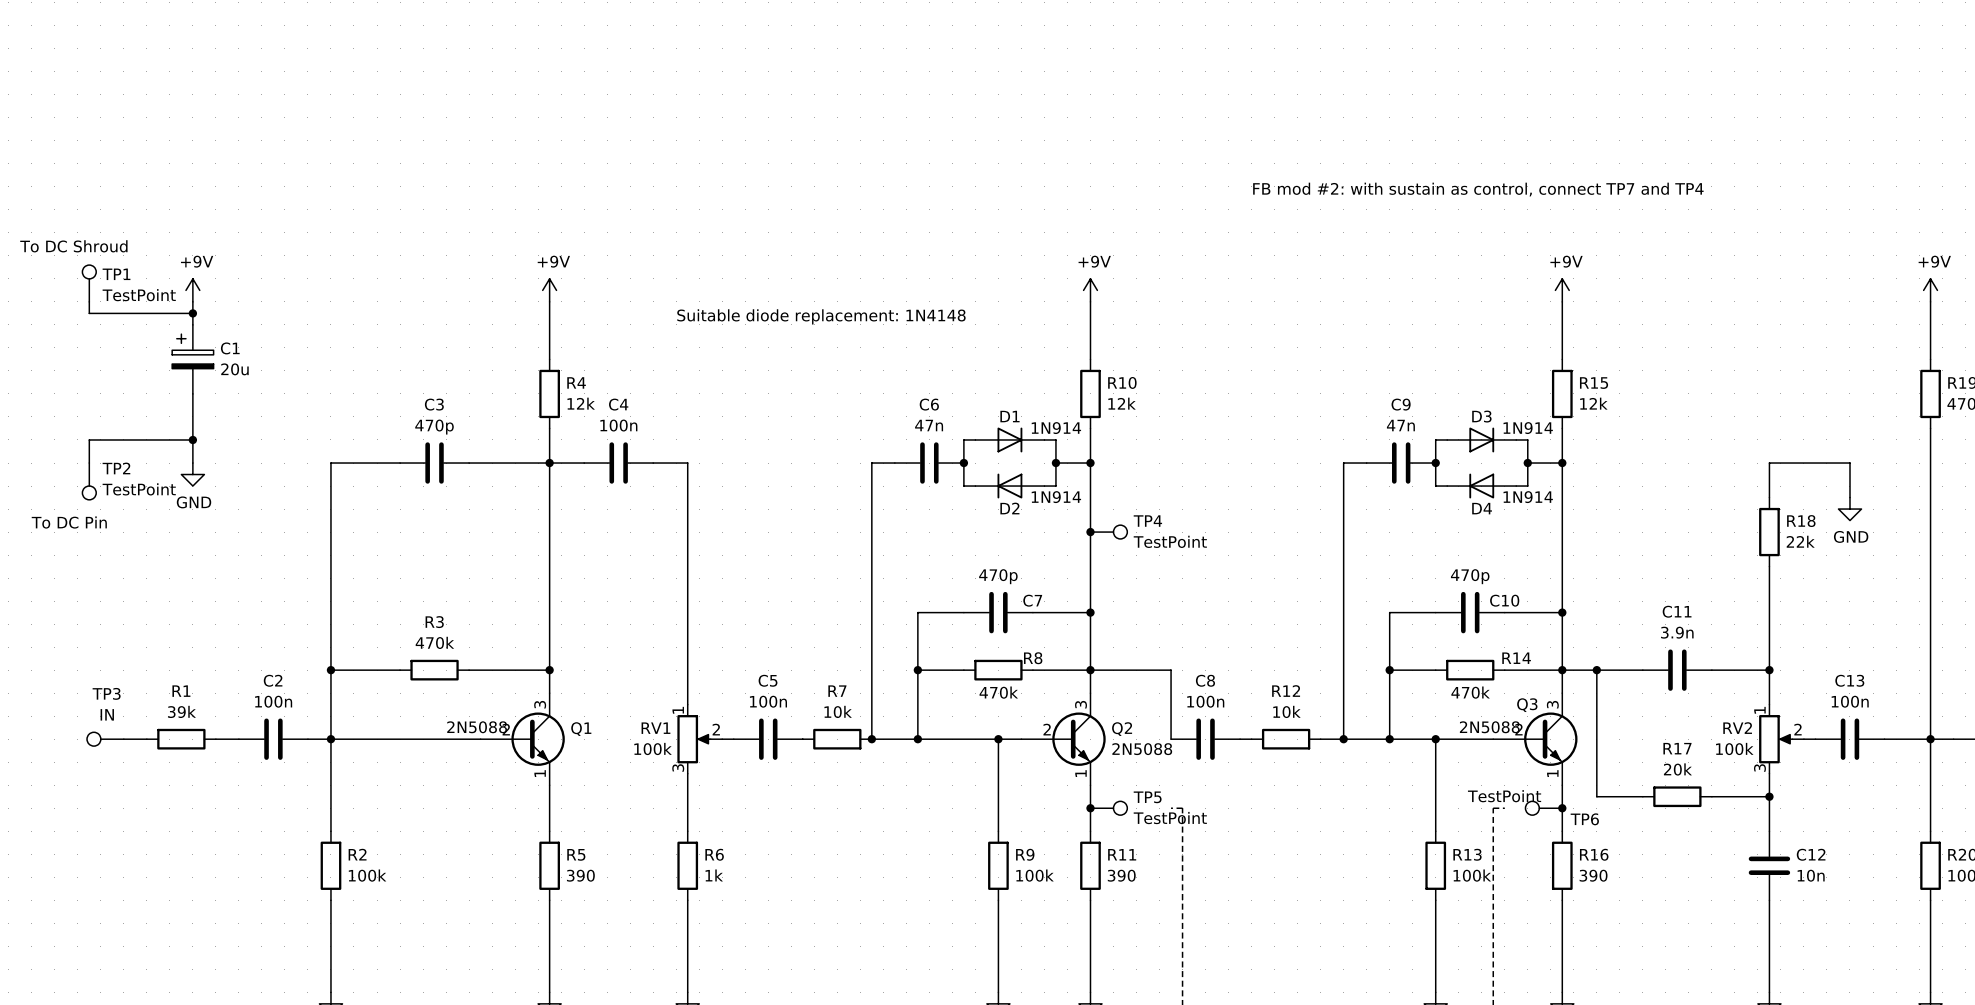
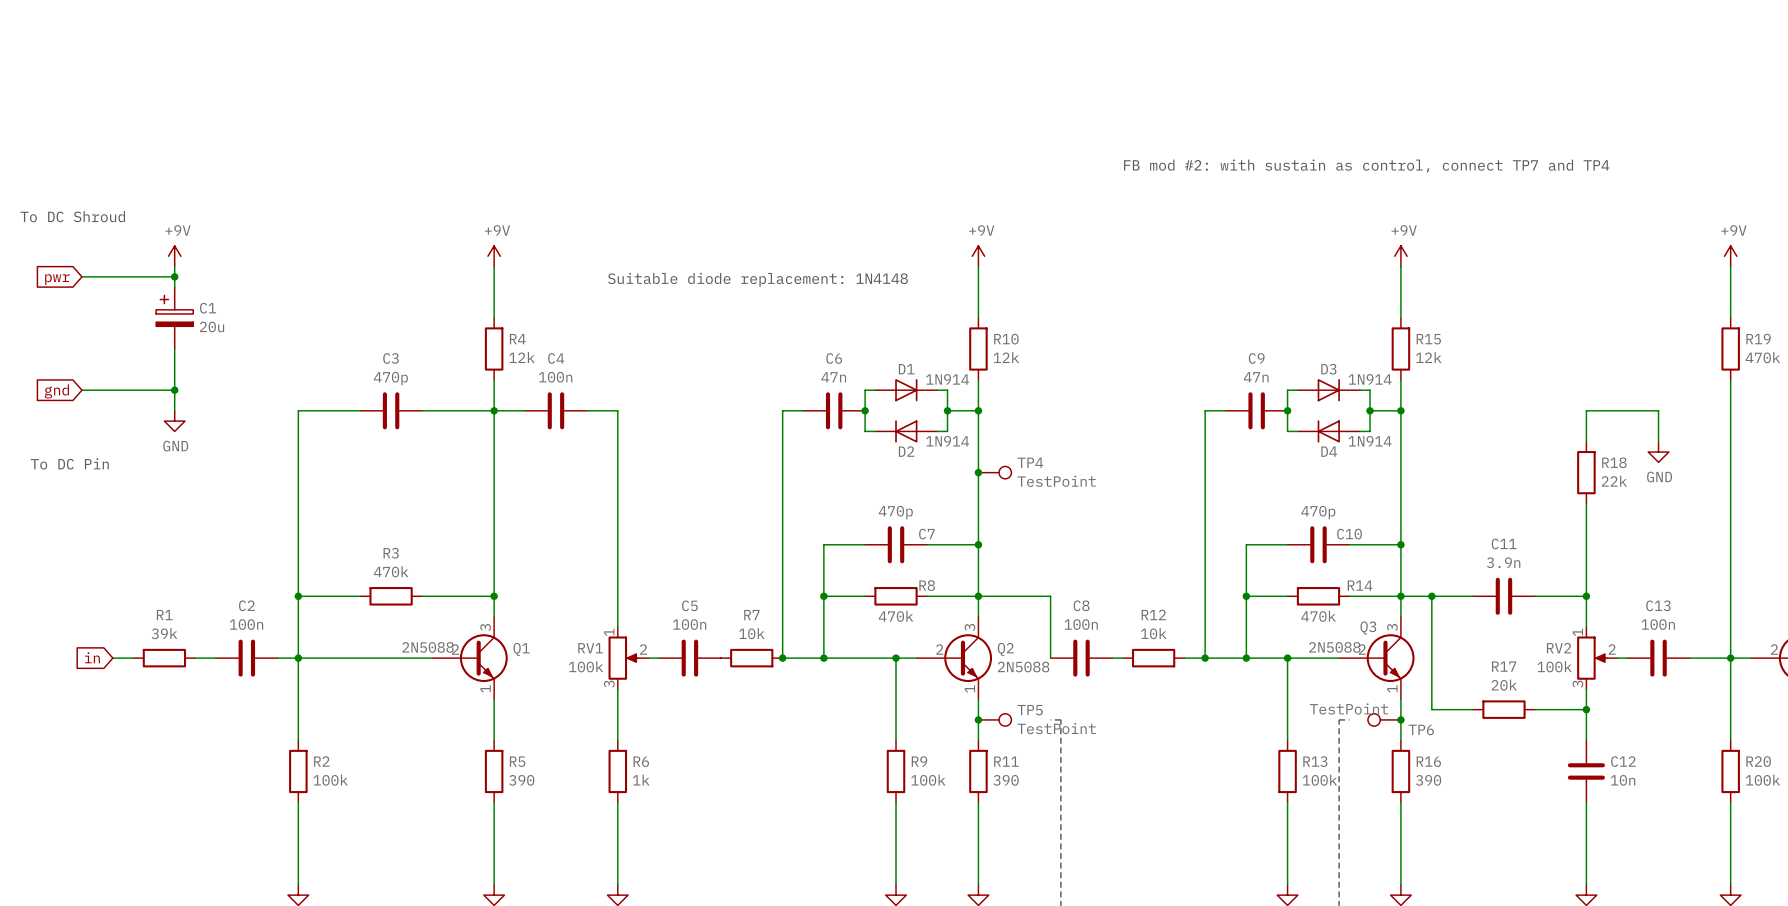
TP1: TestPoint (89, 283) -> none
wire: (89, 301) (89, 313) -> none
global label: none -> pwr (57, 279)
wire: (89, 439) (89, 463) -> none
global label: none -> gnd (56, 391)
TP2: TestPoint (89, 481) -> none
global label: none -> in (92, 657)
TP3: IN (105, 739) -> none

